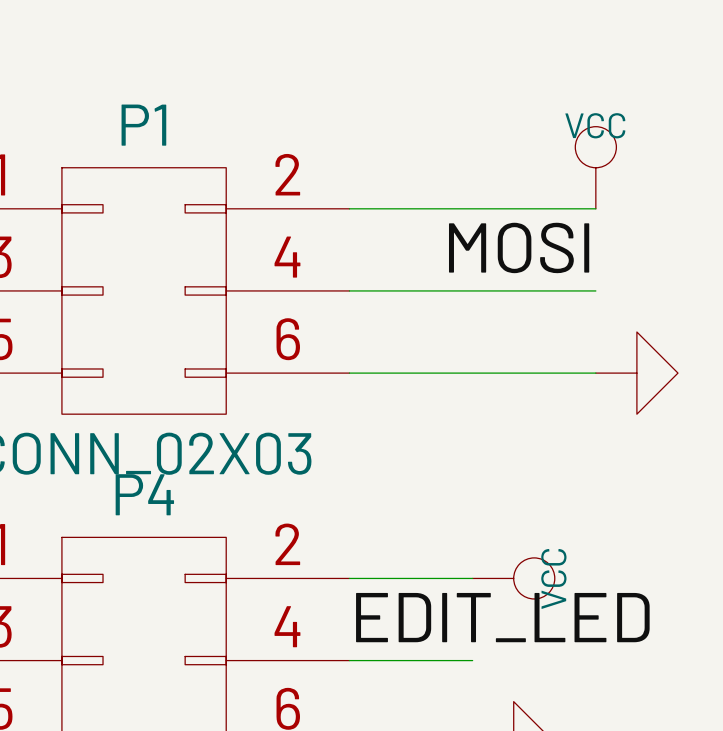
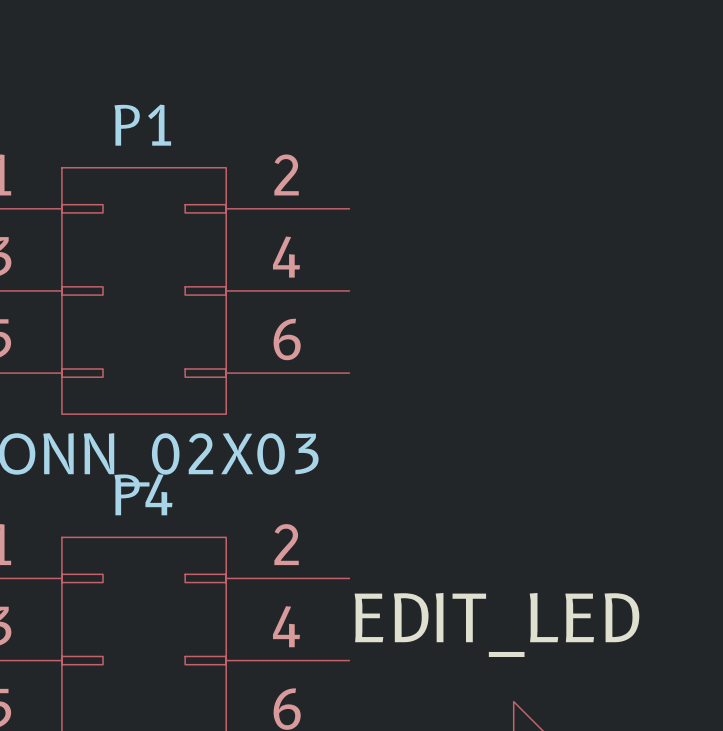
power symbol: VCC (595, 167) -> none
wire: (349, 208) (595, 208) -> none
label: MOSI (519, 247) -> none
wire: (349, 290) (595, 290) -> none
wire: (349, 373) (595, 373) -> none
power symbol: (636, 373) -> none
wire: (349, 578) (472, 578) -> none
power symbol: VCC (513, 578) -> none
wire: (349, 660) (472, 660) -> none

